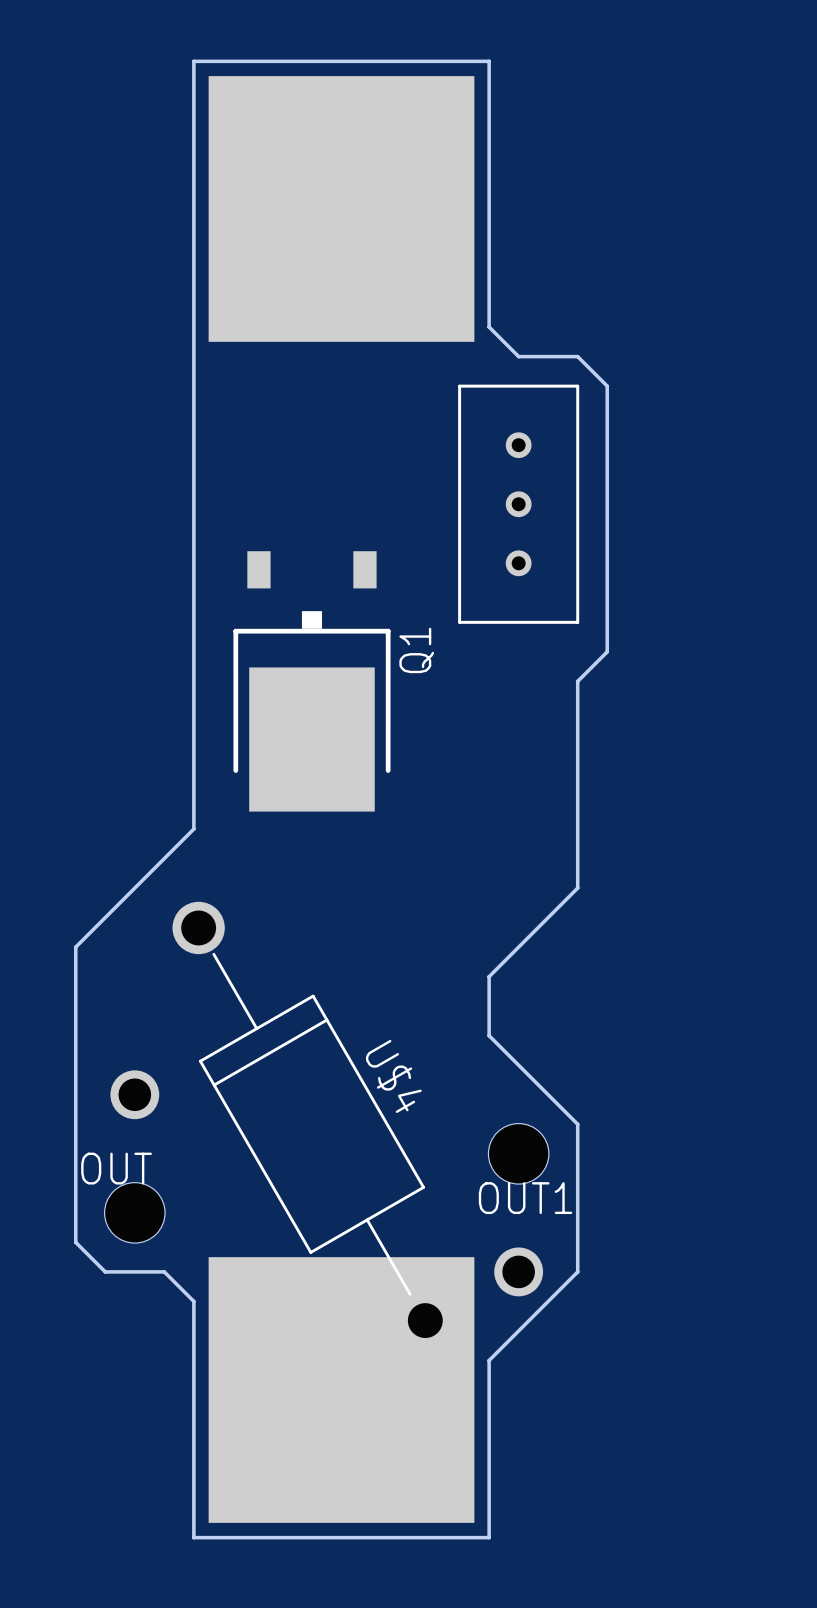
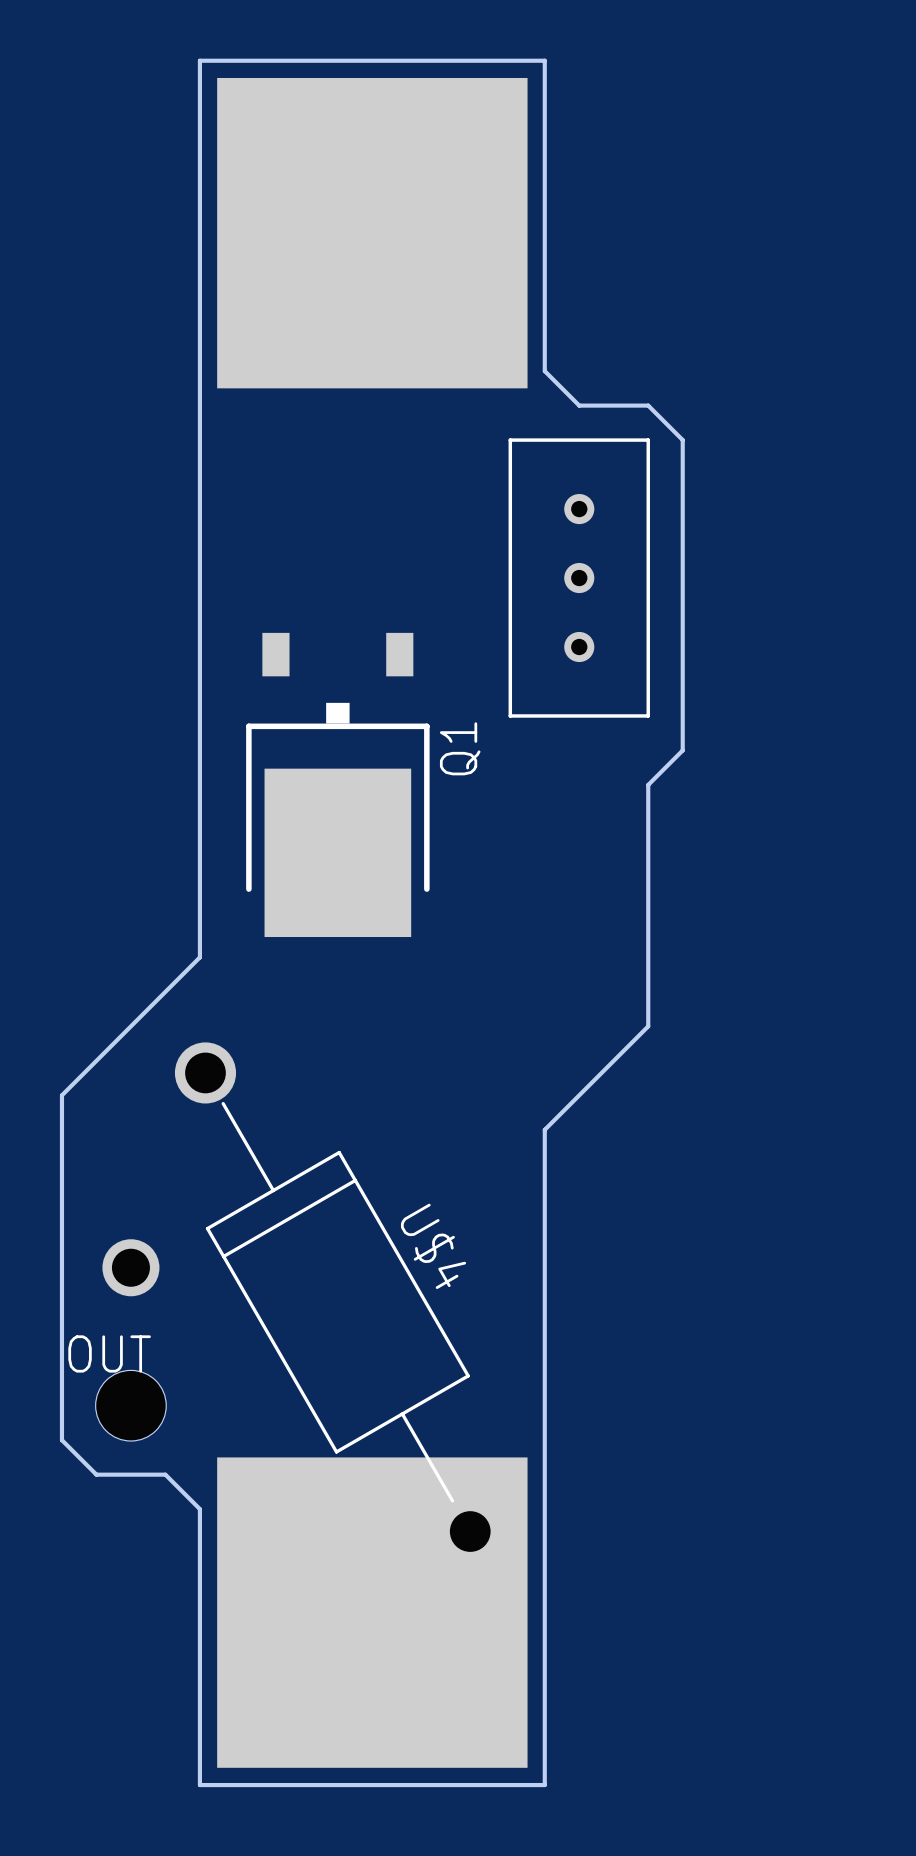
board edge: (489, 1035) (577, 1124) (577, 1271) (489, 1360) -> (544, 1198) (544, 1578)
OUT1: (518, 1209) -> none

